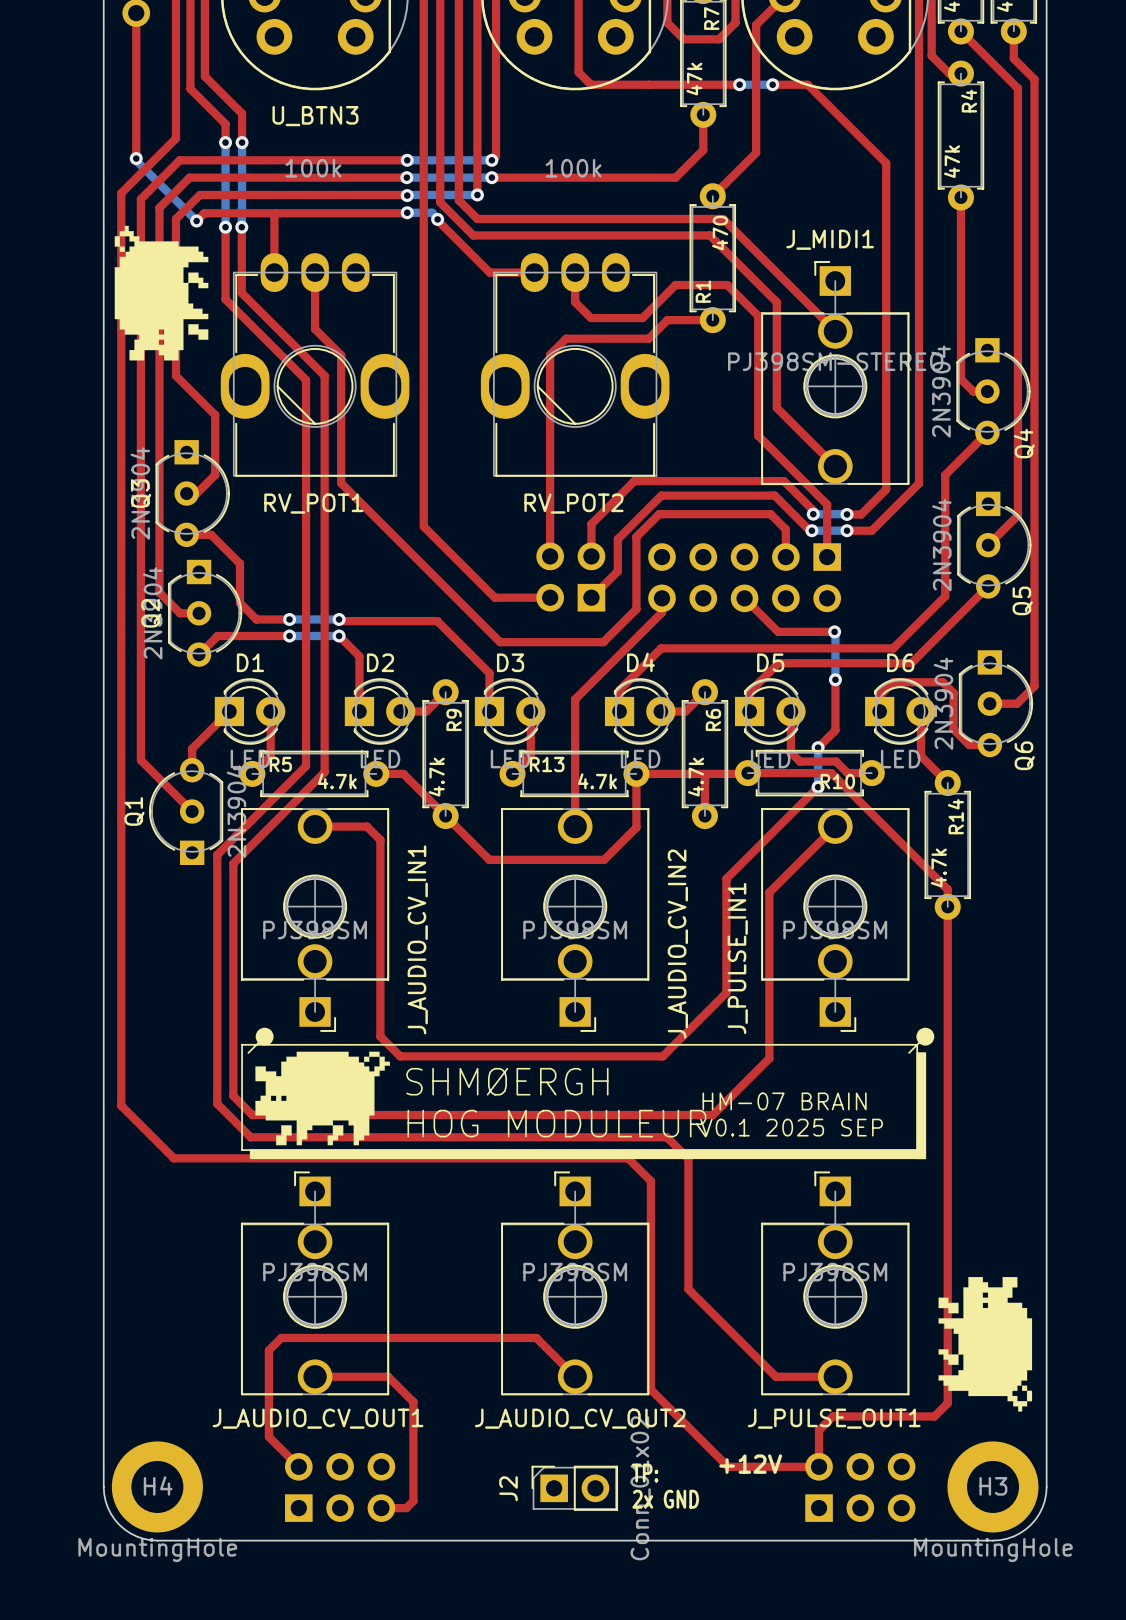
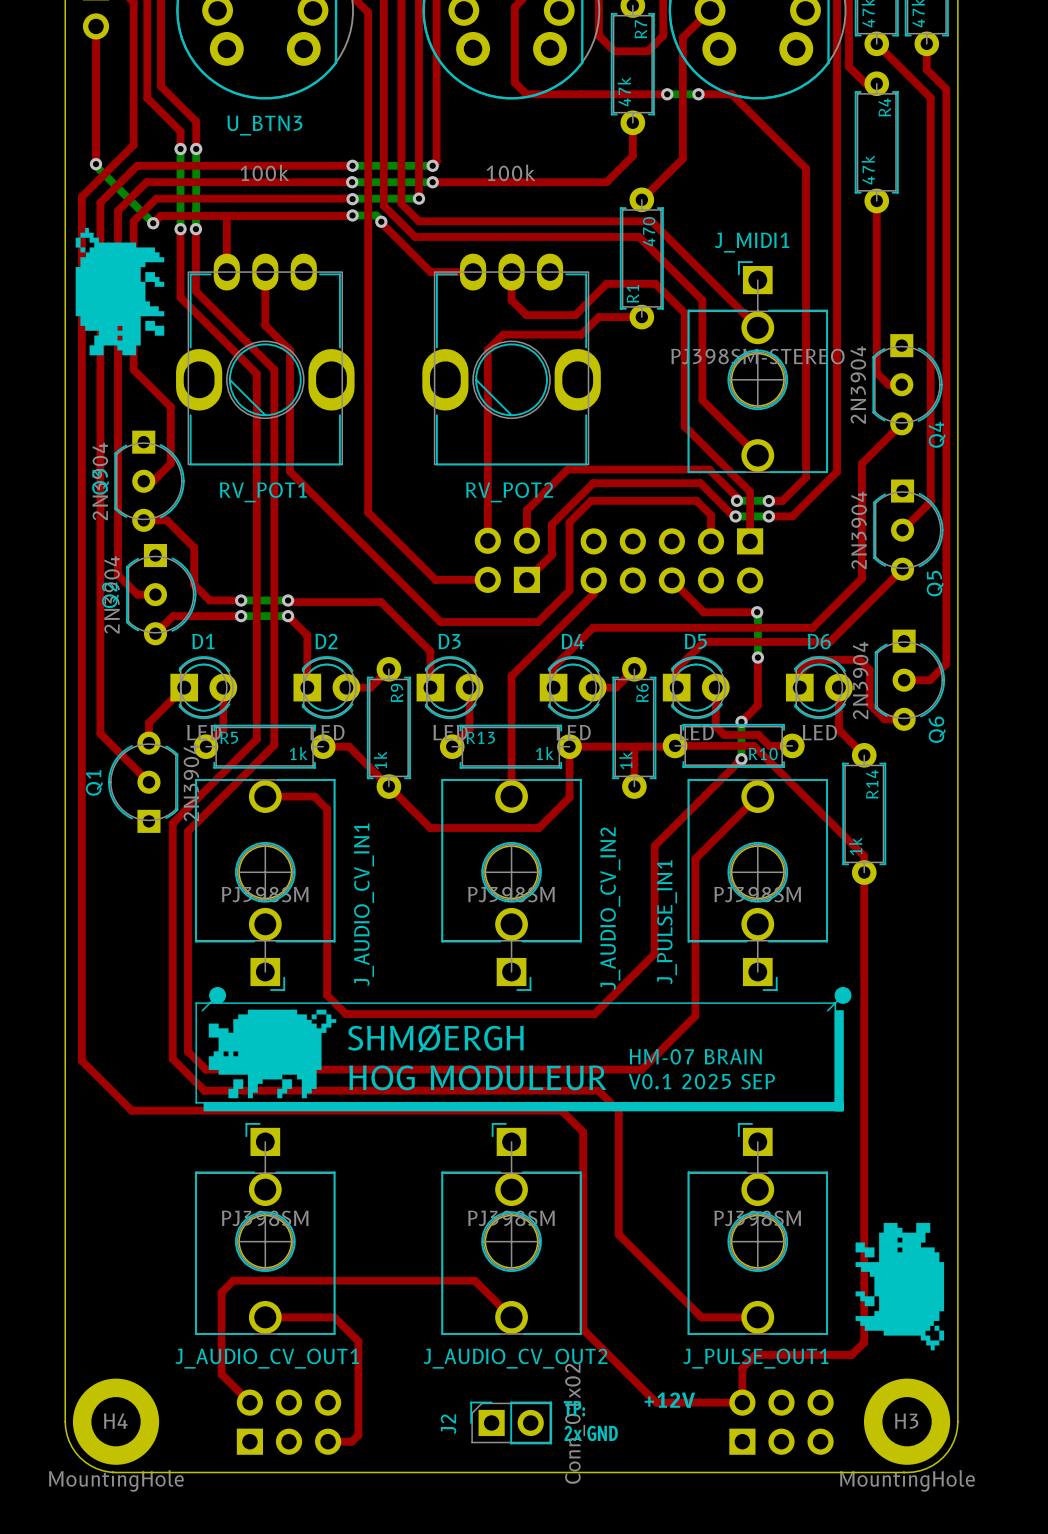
R9 value: 4.7k (436, 777) -> 1k (380, 760)
R6 value: 4.7k (696, 777) -> 1k (625, 760)
R5 value: 4.7k (337, 781) -> 1k (298, 753)
R13 value: 4.7k (597, 781) -> 1k (544, 753)
R14 value: 4.7k (938, 867) -> 1k (855, 846)

